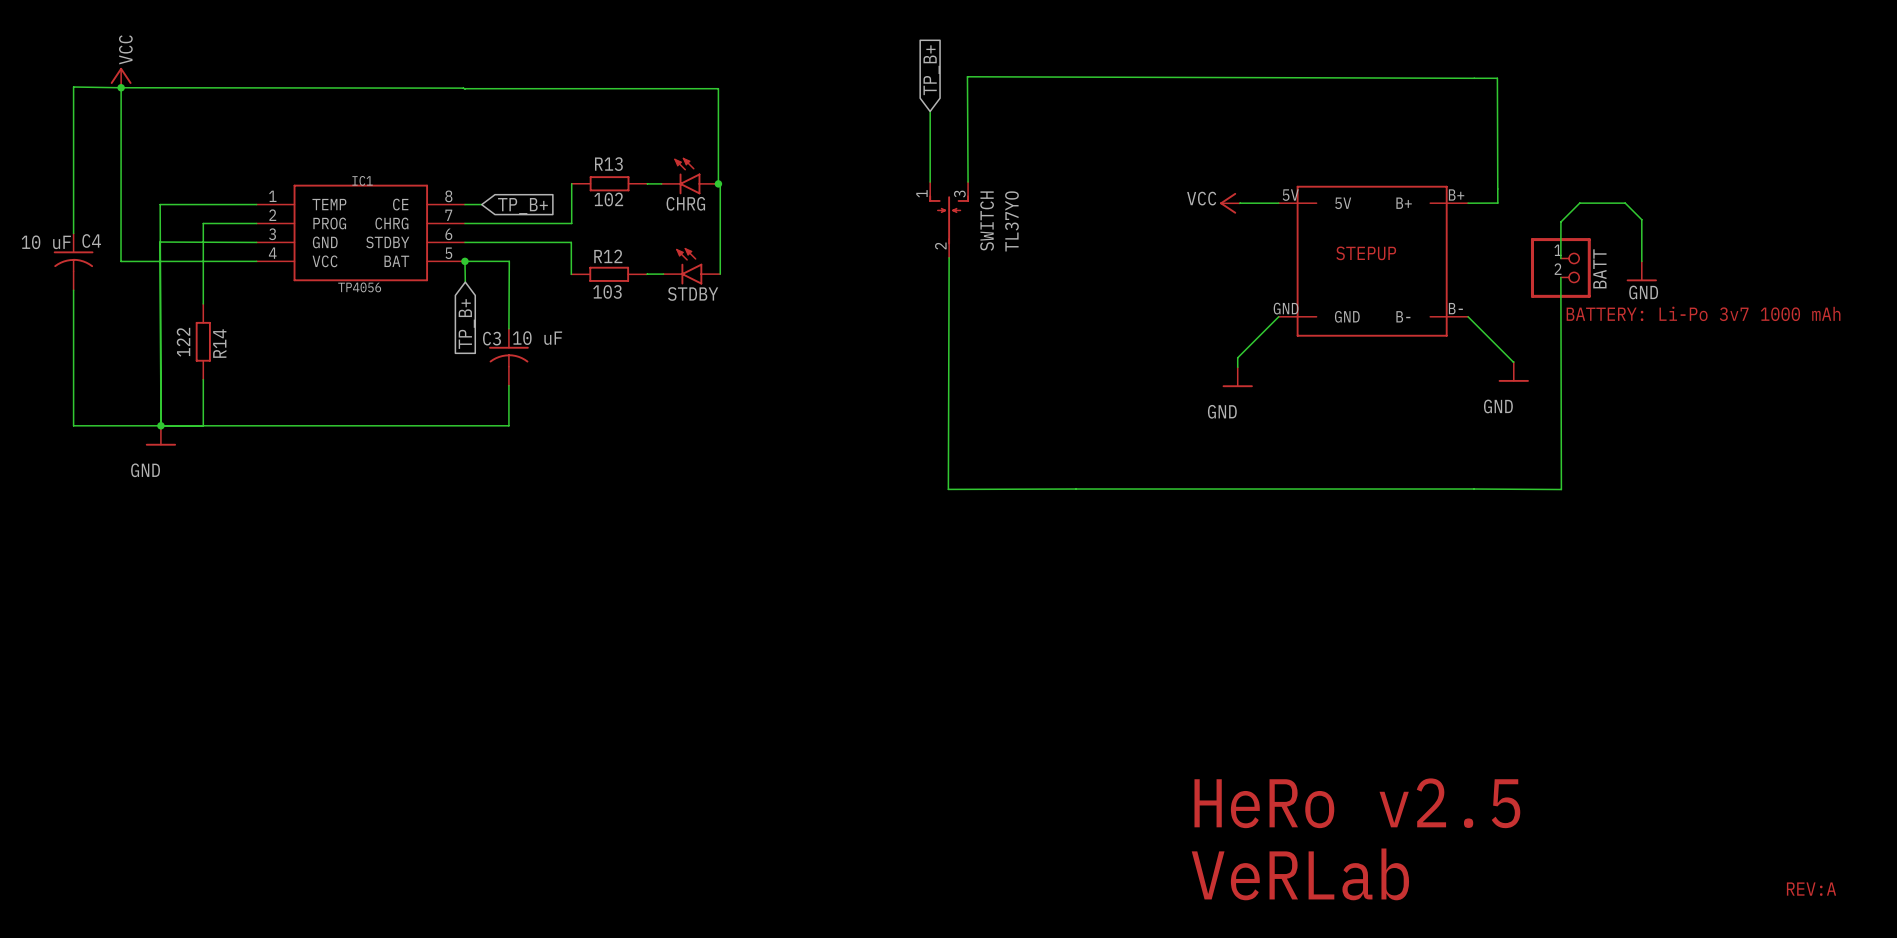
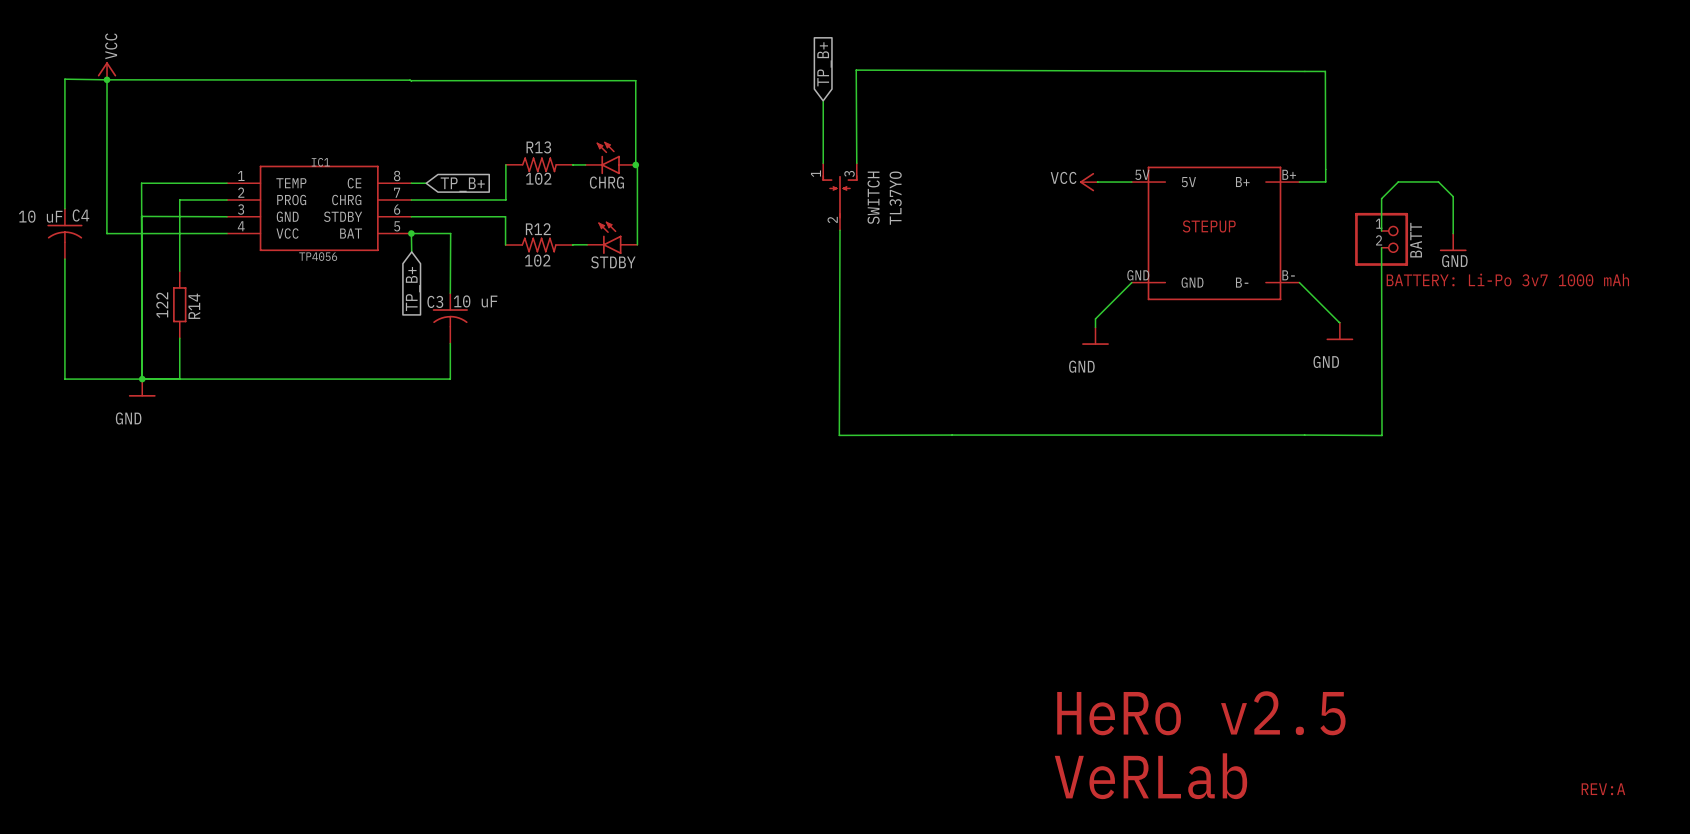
R13 symbol: [571, 176, 648, 192] -> [505, 157, 573, 173]
R12 symbol: [571, 266, 648, 282] -> [505, 237, 573, 253]
R12 value: 103 (607, 291) -> 102 (537, 260)

